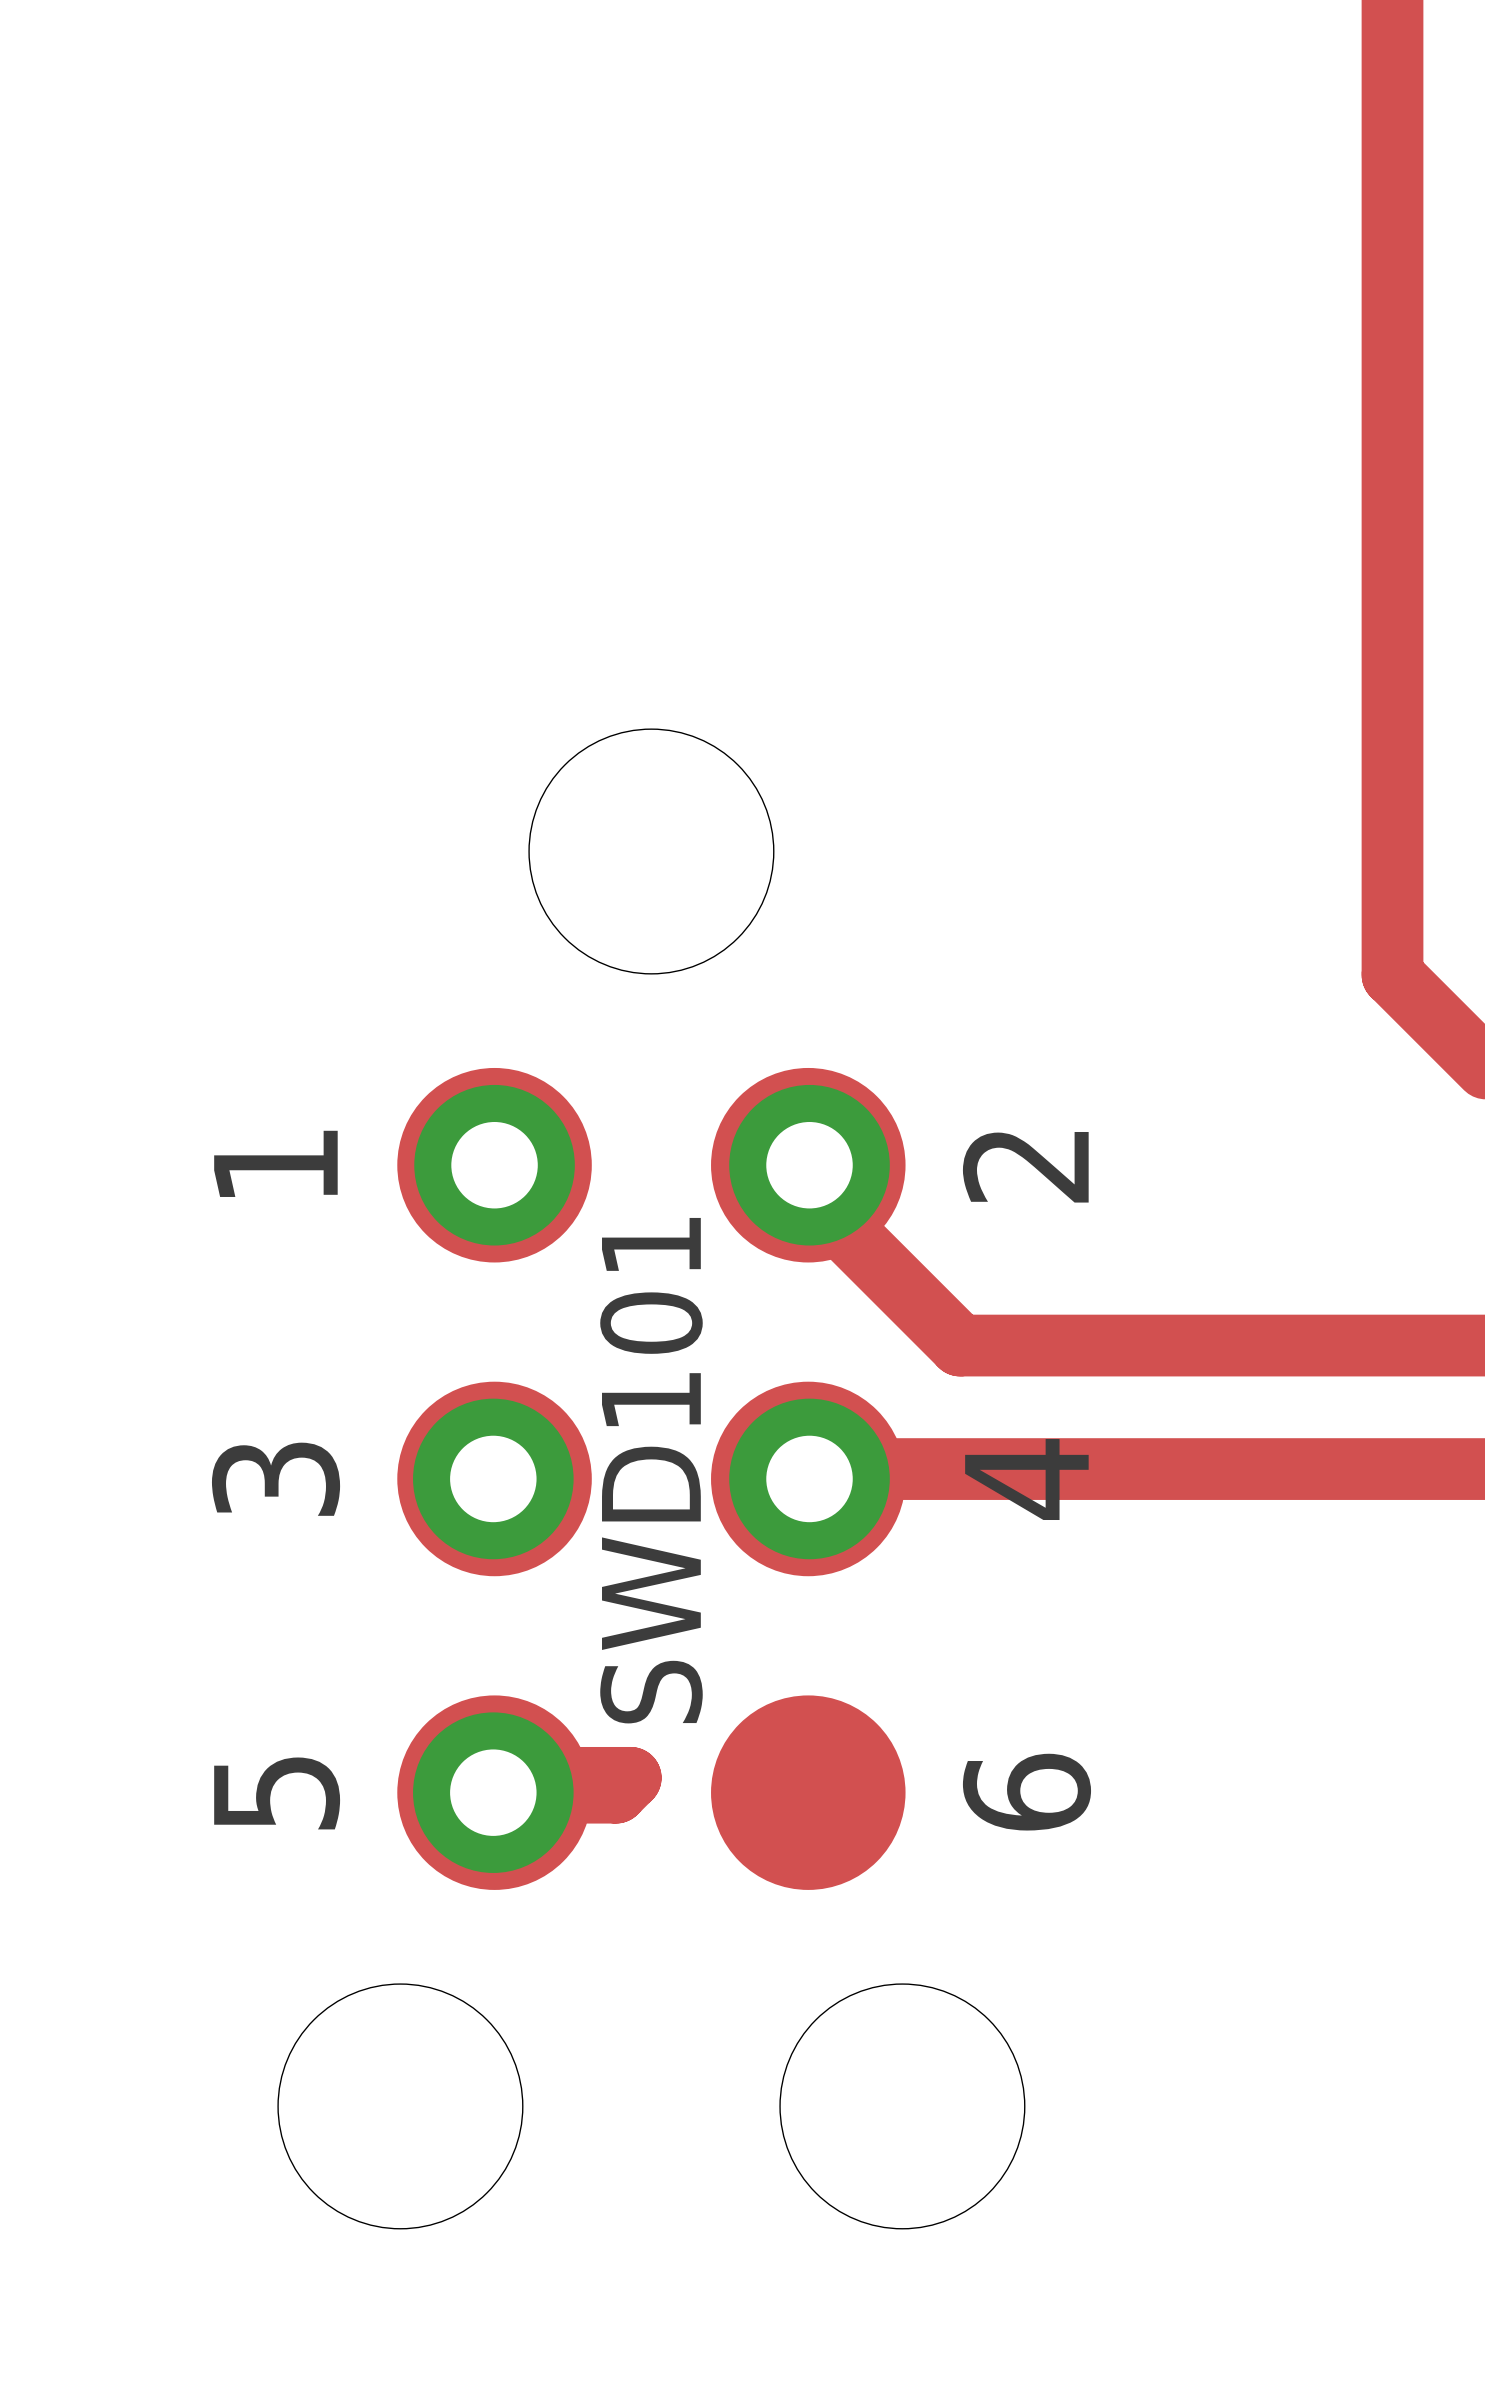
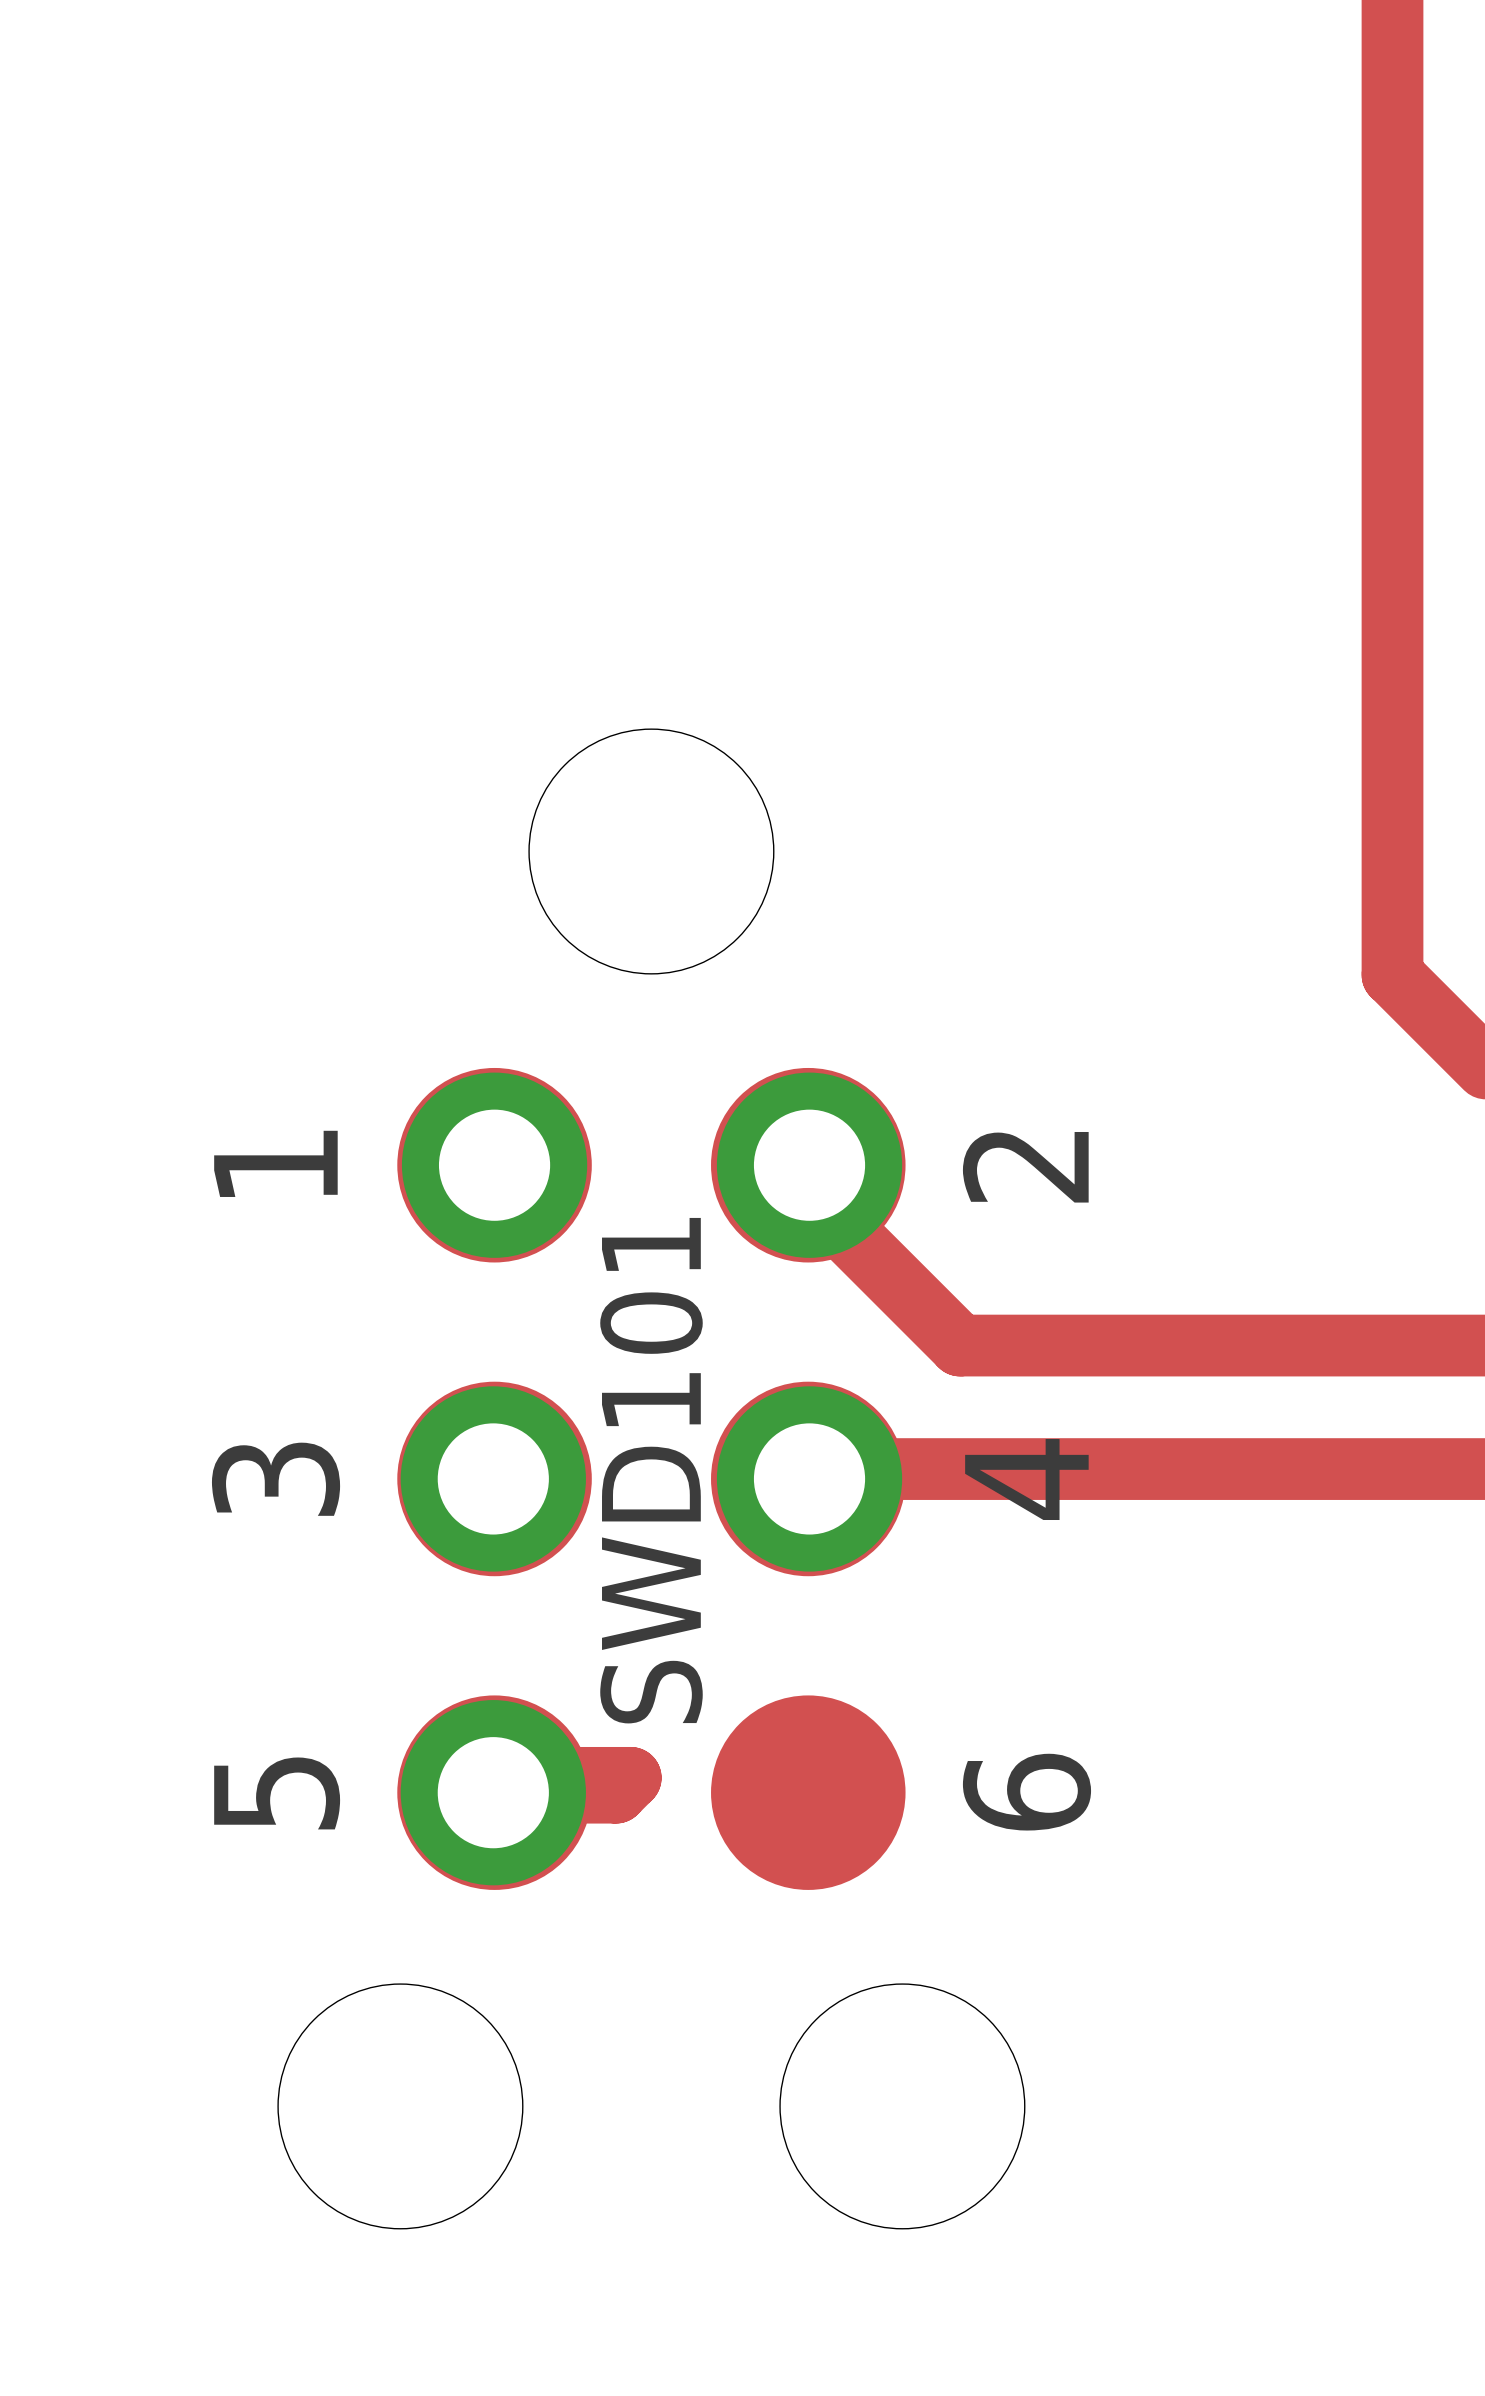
via size: [414, 1084, 575, 1246] -> [401, 1072, 588, 1258]
via size: [729, 1084, 890, 1246] -> [716, 1072, 903, 1258]
via size: [413, 1398, 574, 1560] -> [400, 1386, 586, 1572]
via size: [729, 1398, 890, 1560] -> [716, 1386, 903, 1572]
via size: [413, 1712, 574, 1873] -> [400, 1700, 586, 1886]

